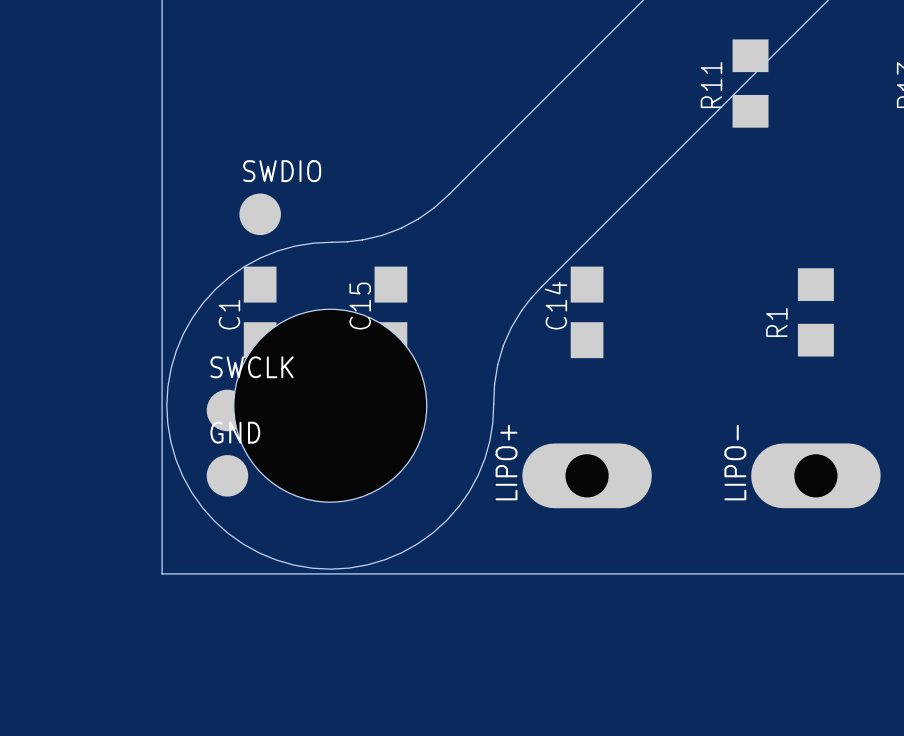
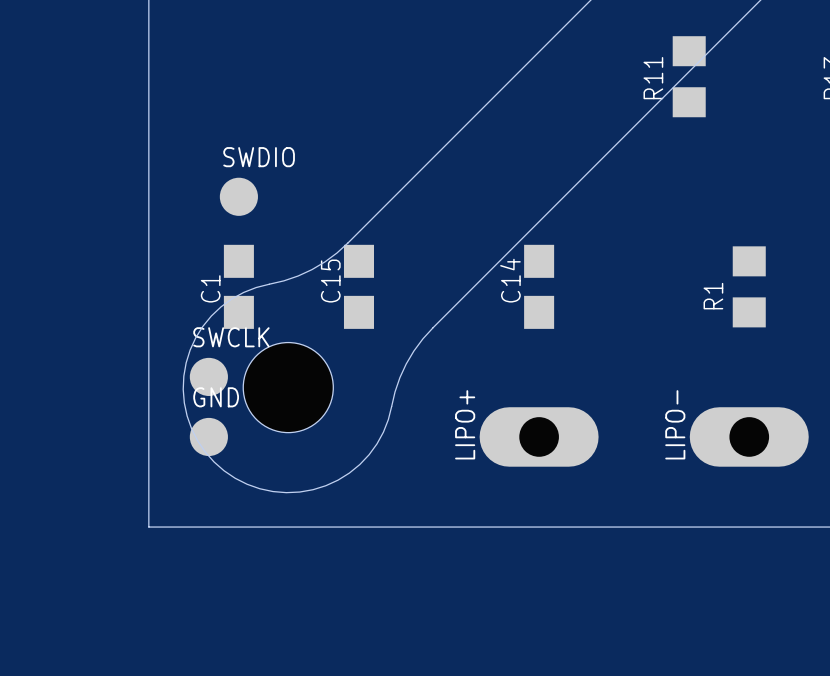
board edge: (449, 194) (418, 218) (382, 235) (362, 239) (295, 246) (260, 257) (229, 277) (203, 303) (192, 317) (183, 334) (171, 368) (166, 405) (167, 423) (175, 459) (182, 476) (191, 492) (214, 521) (243, 544) (259, 553) (276, 560) (312, 568) (330, 569) (367, 564) (401, 552) (418, 543) (432, 532) (458, 506) (478, 475) (489, 440) (494, 384) (503, 345) (521, 310) (541, 286) -> (412, 178) (348, 242) (324, 261) (298, 275) (243, 292) (221, 306) (202, 326) (195, 337) (186, 362) (183, 389) (187, 416) (191, 428) (205, 451) (213, 461) (224, 470) (247, 484) (259, 488) (286, 492) (313, 489) (338, 480) (349, 473) (369, 454) (383, 432) (399, 377) (413, 350) (433, 327) (497, 263)
hole size: [233, 309, 427, 503] -> [243, 342, 334, 433]

